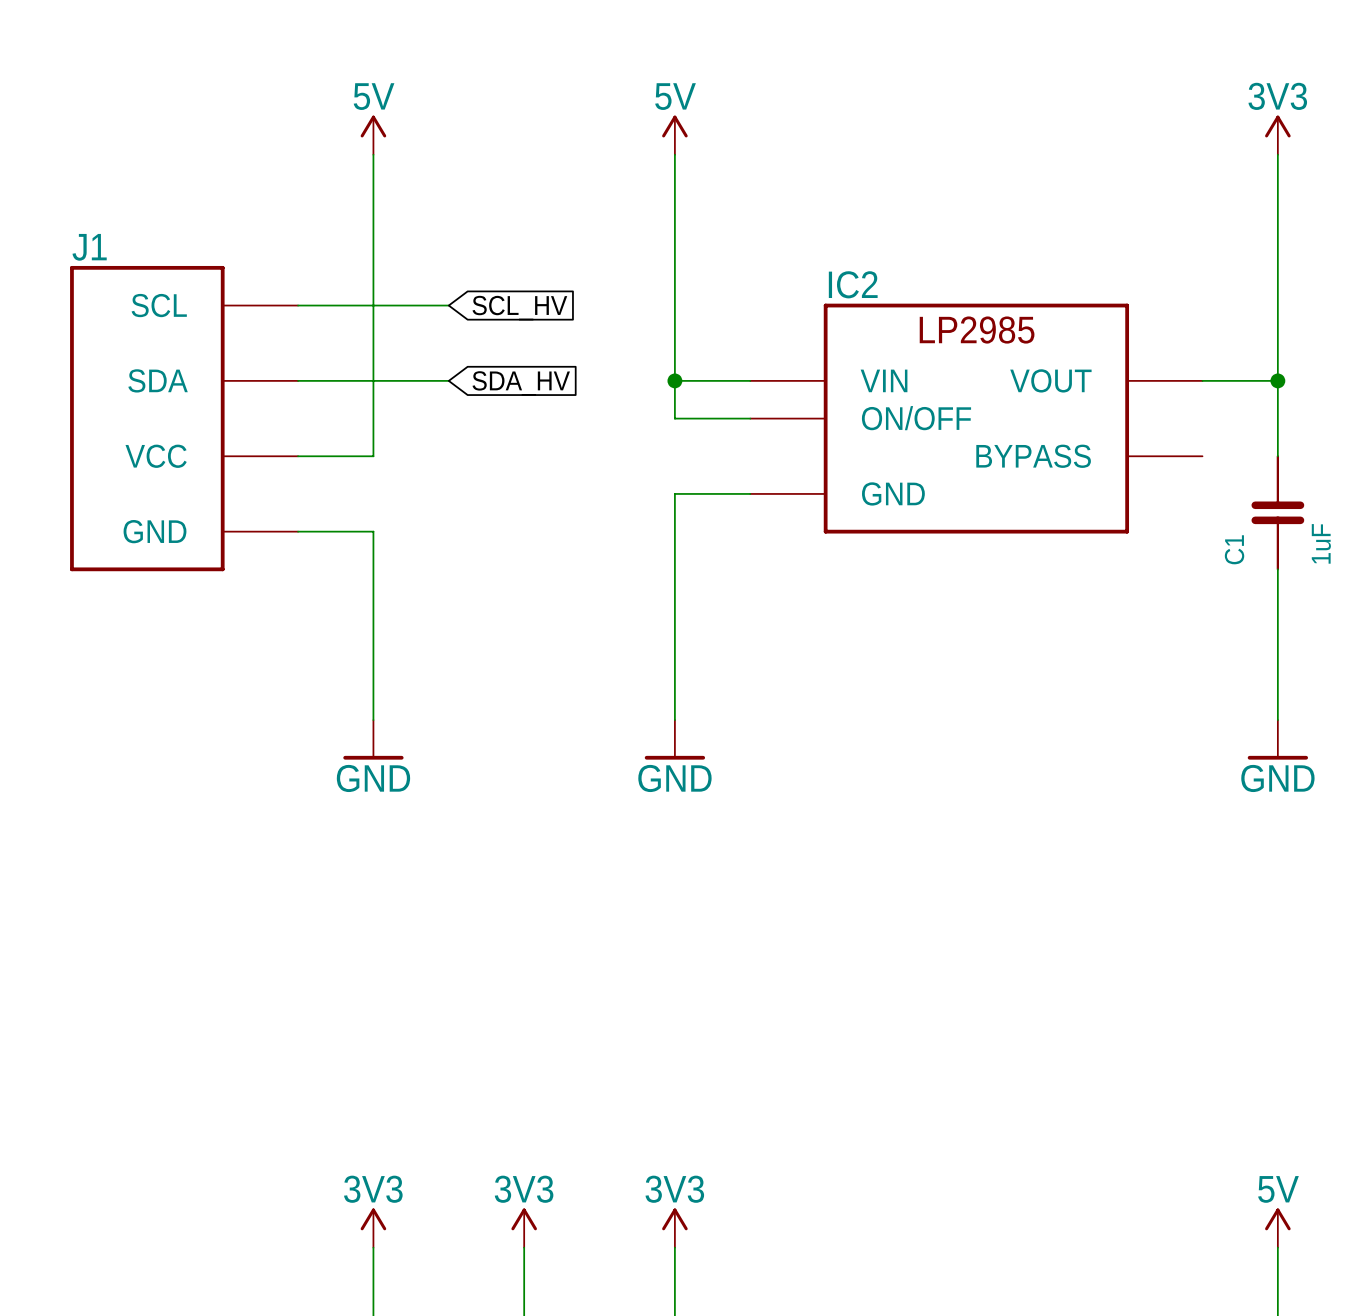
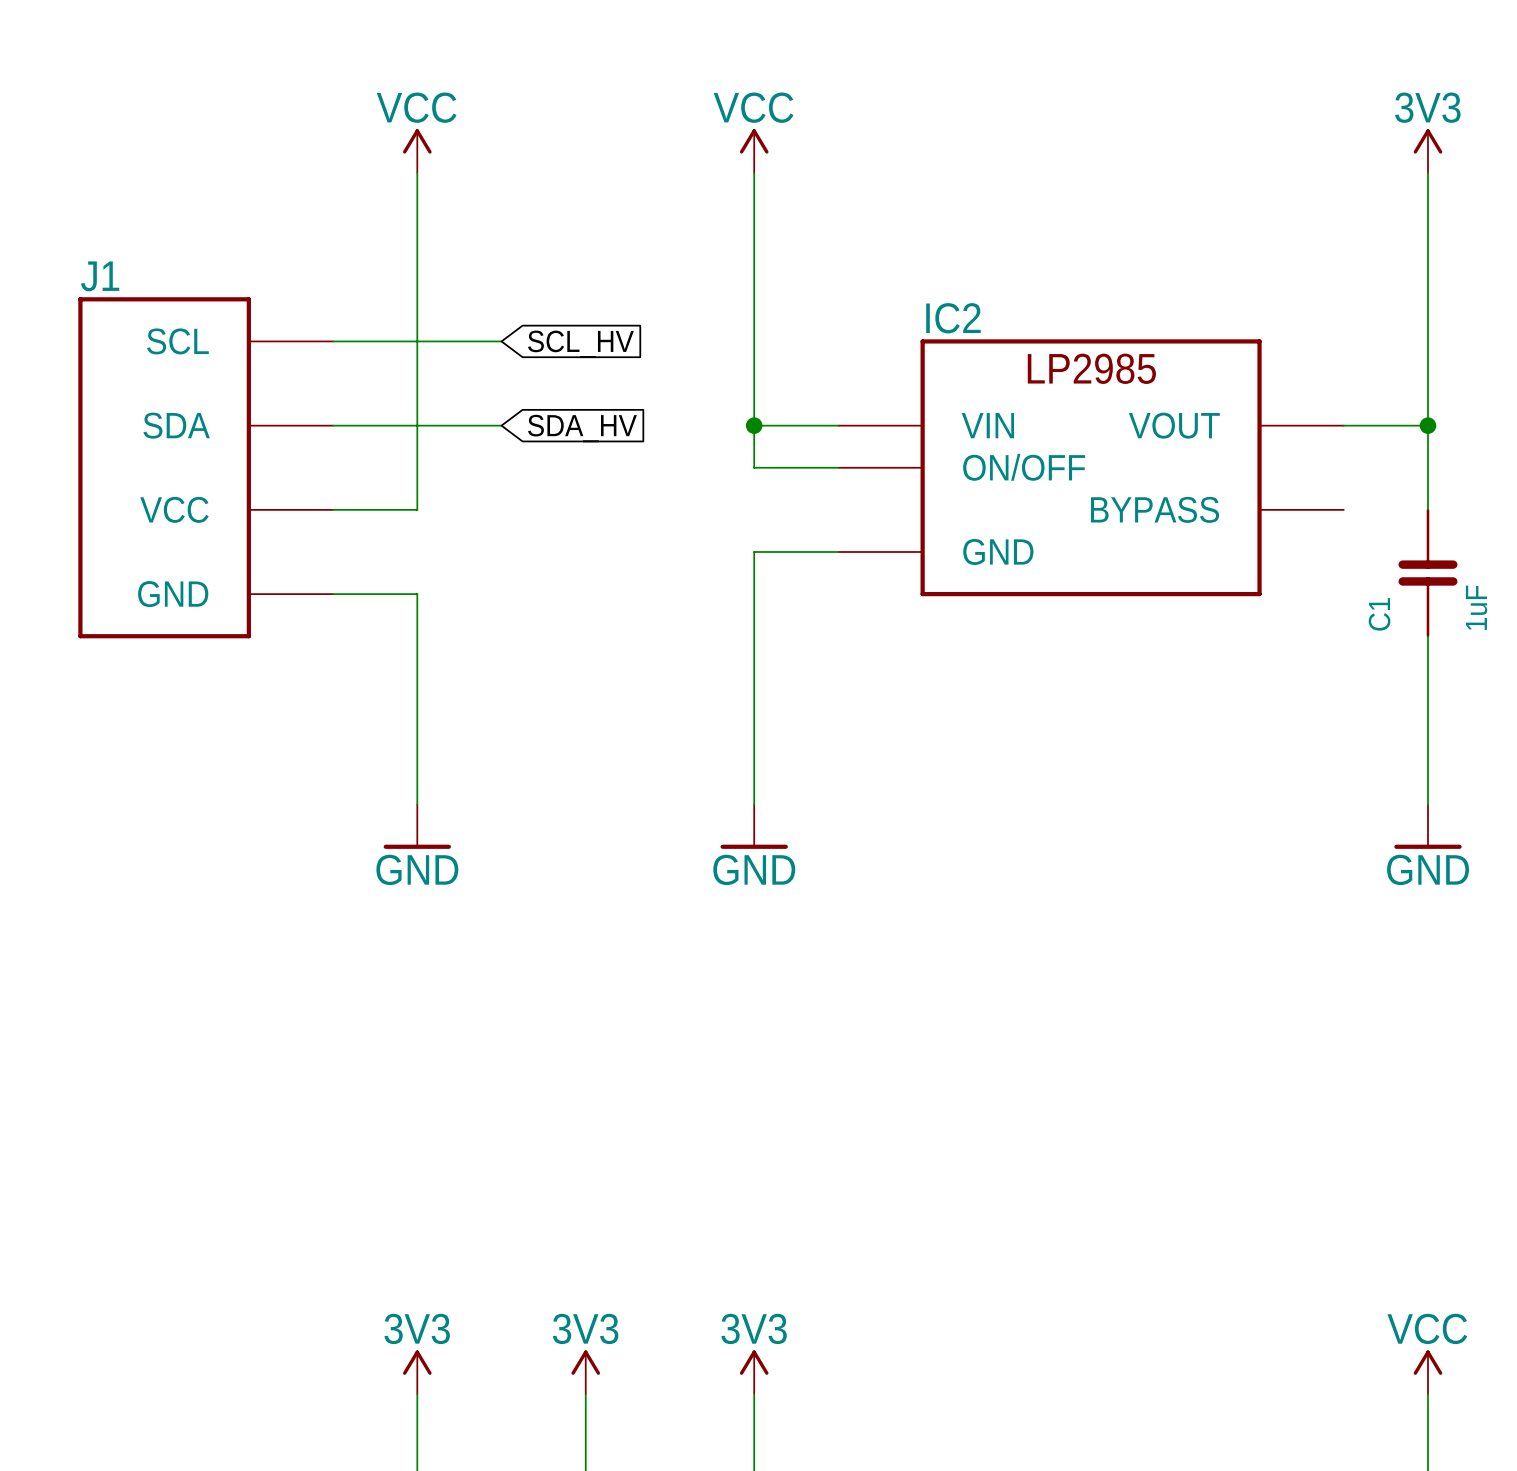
power symbol: 5V (373, 135) -> VCC (417, 151)
power symbol: 5V (674, 135) -> VCC (754, 151)
power symbol: 5V (1277, 1228) -> VCC (1427, 1372)

